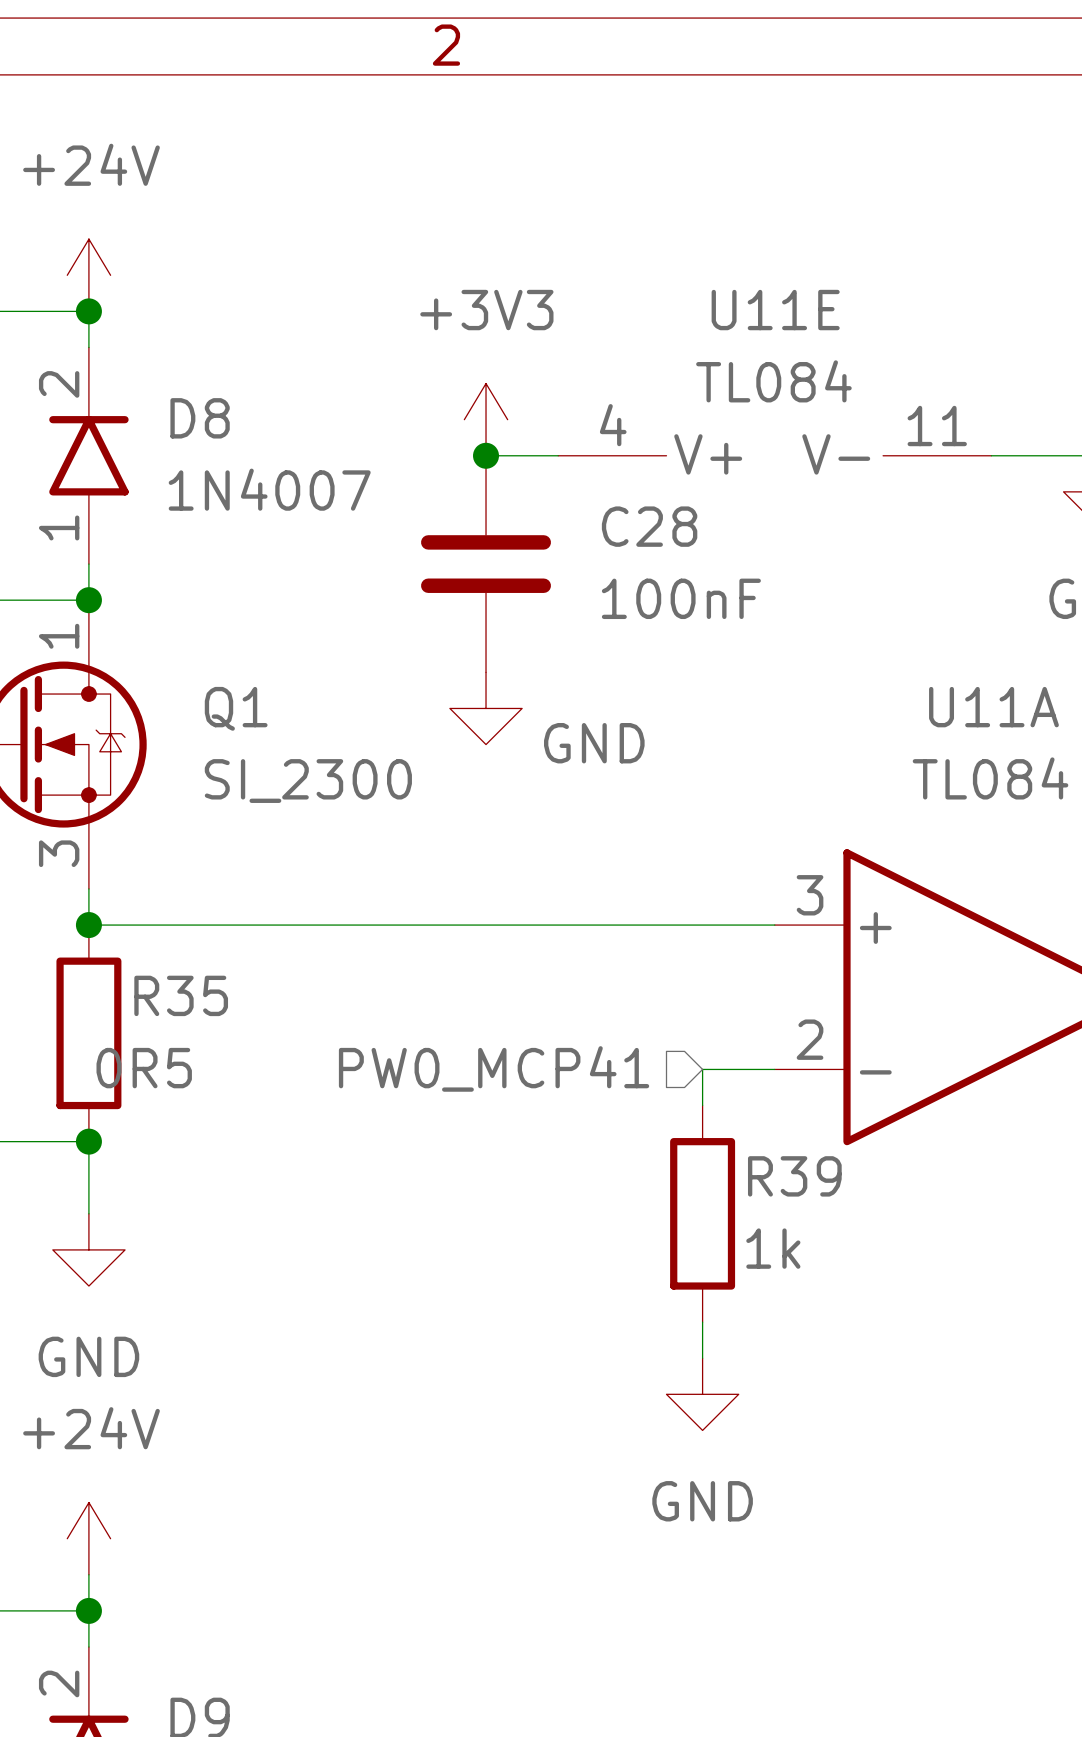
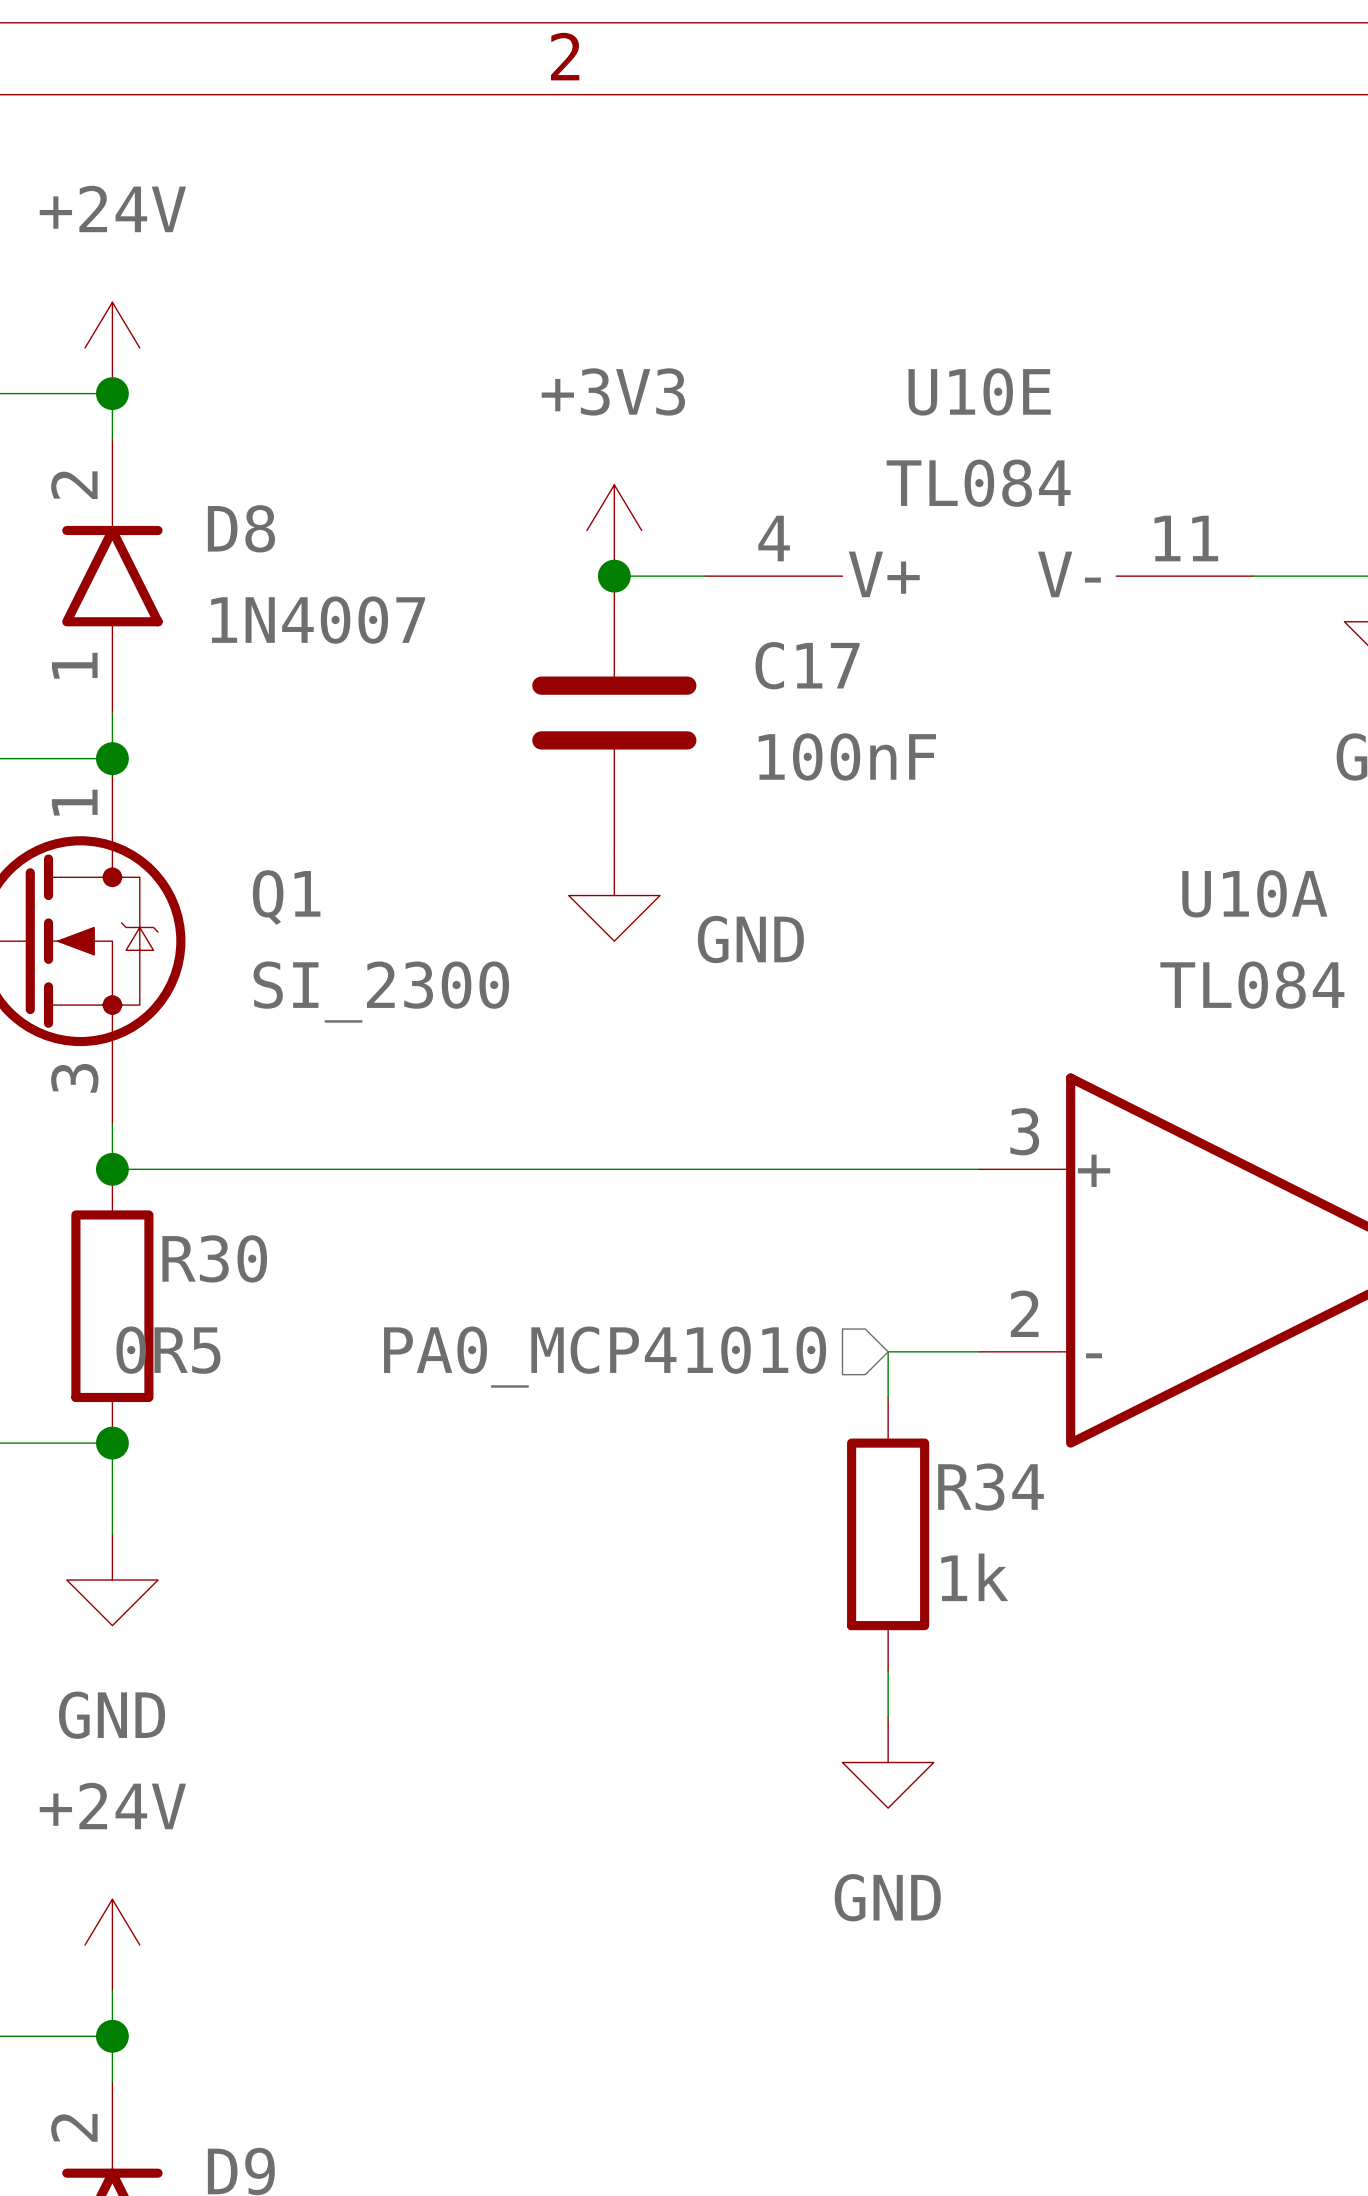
U11E name: U11E (775, 310) -> U10E (979, 391)
C28 name: C28 (649, 526) -> C17 (807, 665)
U11A name: U11A (993, 707) -> U10A (1254, 893)
R35 name: R35 (181, 995) -> R30 (214, 1258)
hierarchical label: PW0_MCP41 (494, 1068) -> PA0_MCP41010 (605, 1357)
R39 name: R39 (794, 1176) -> R34 (990, 1487)

